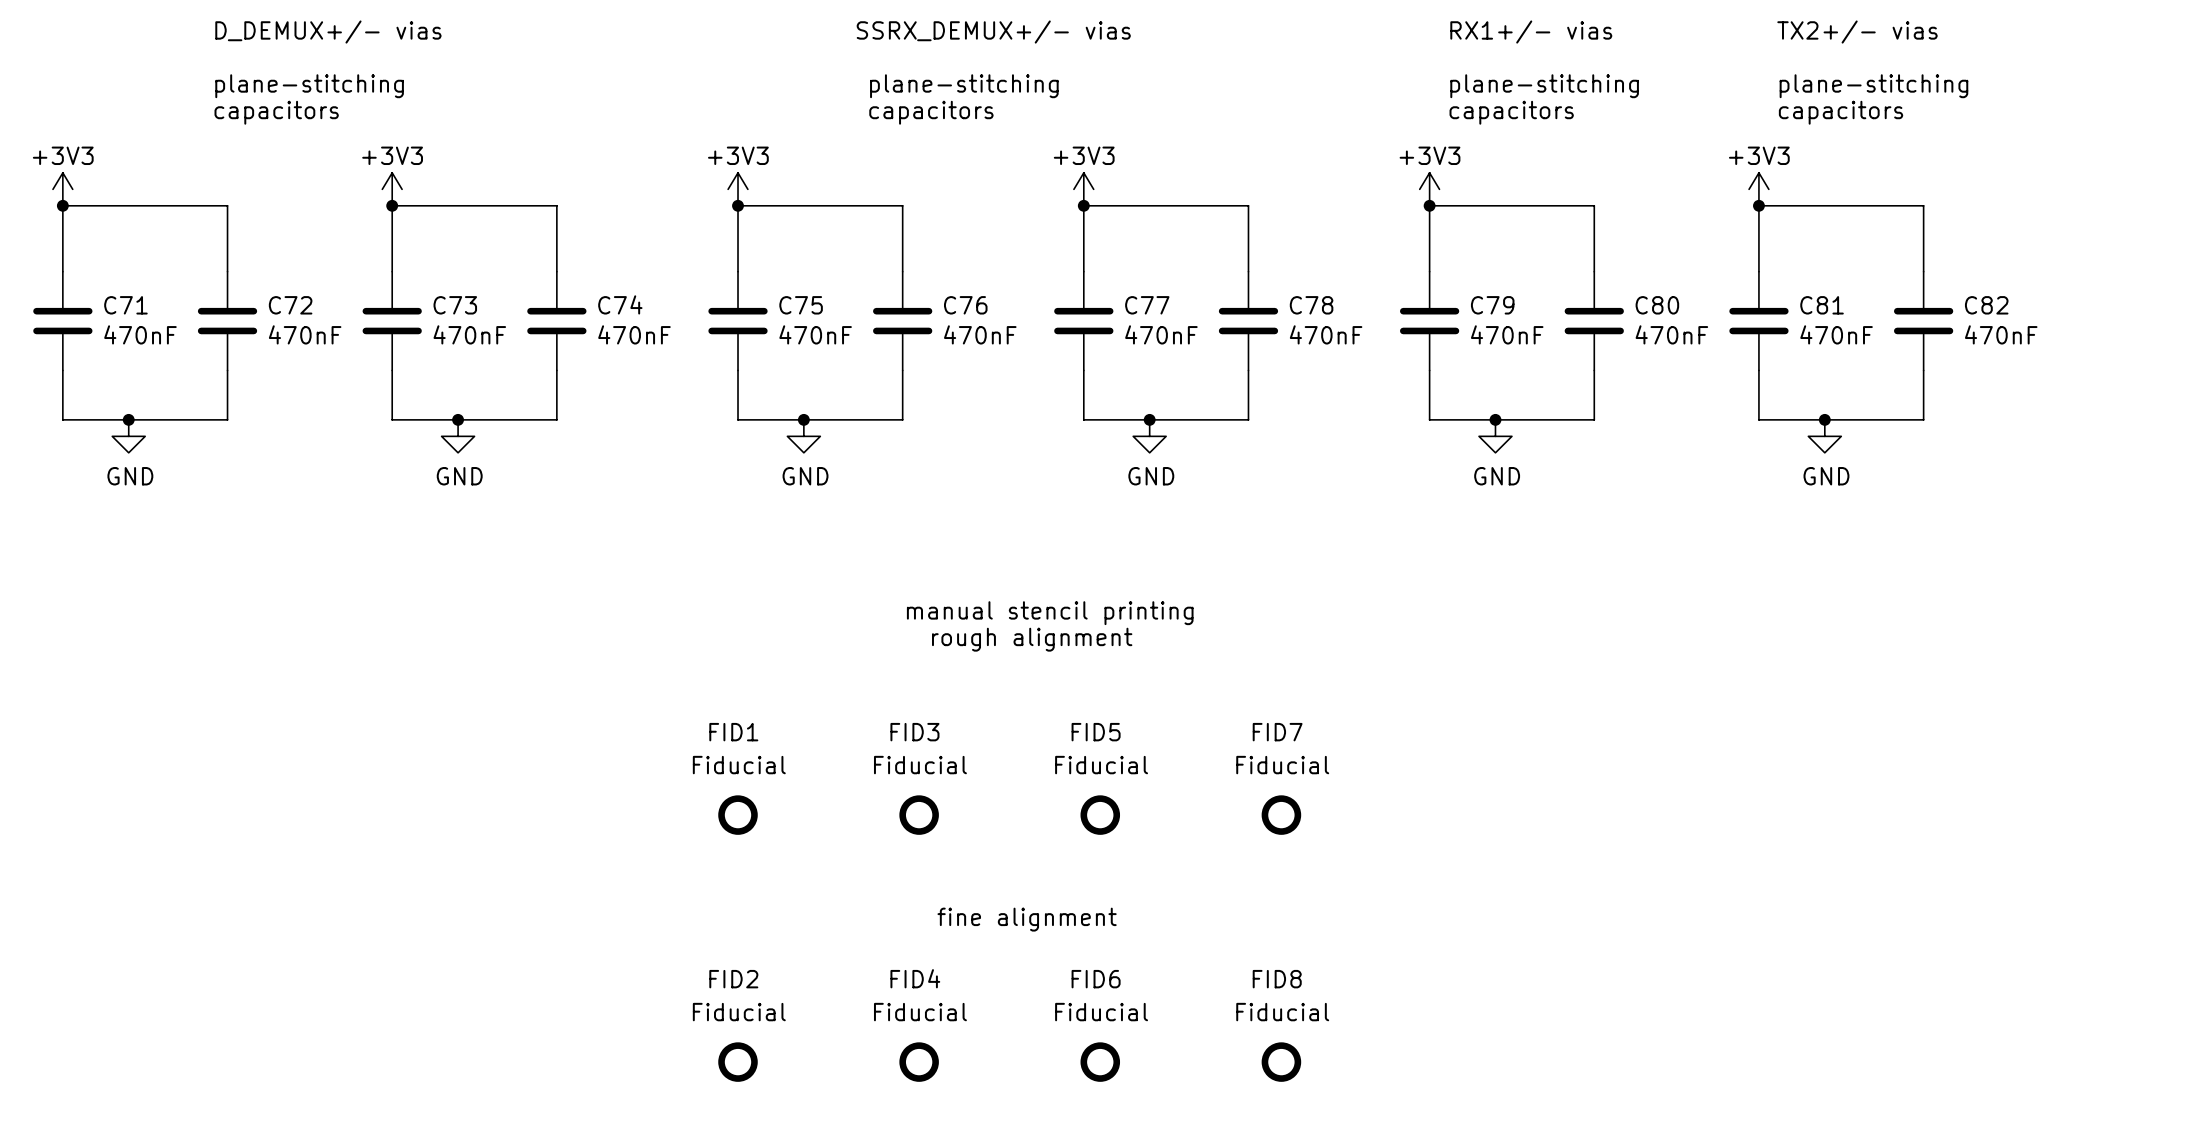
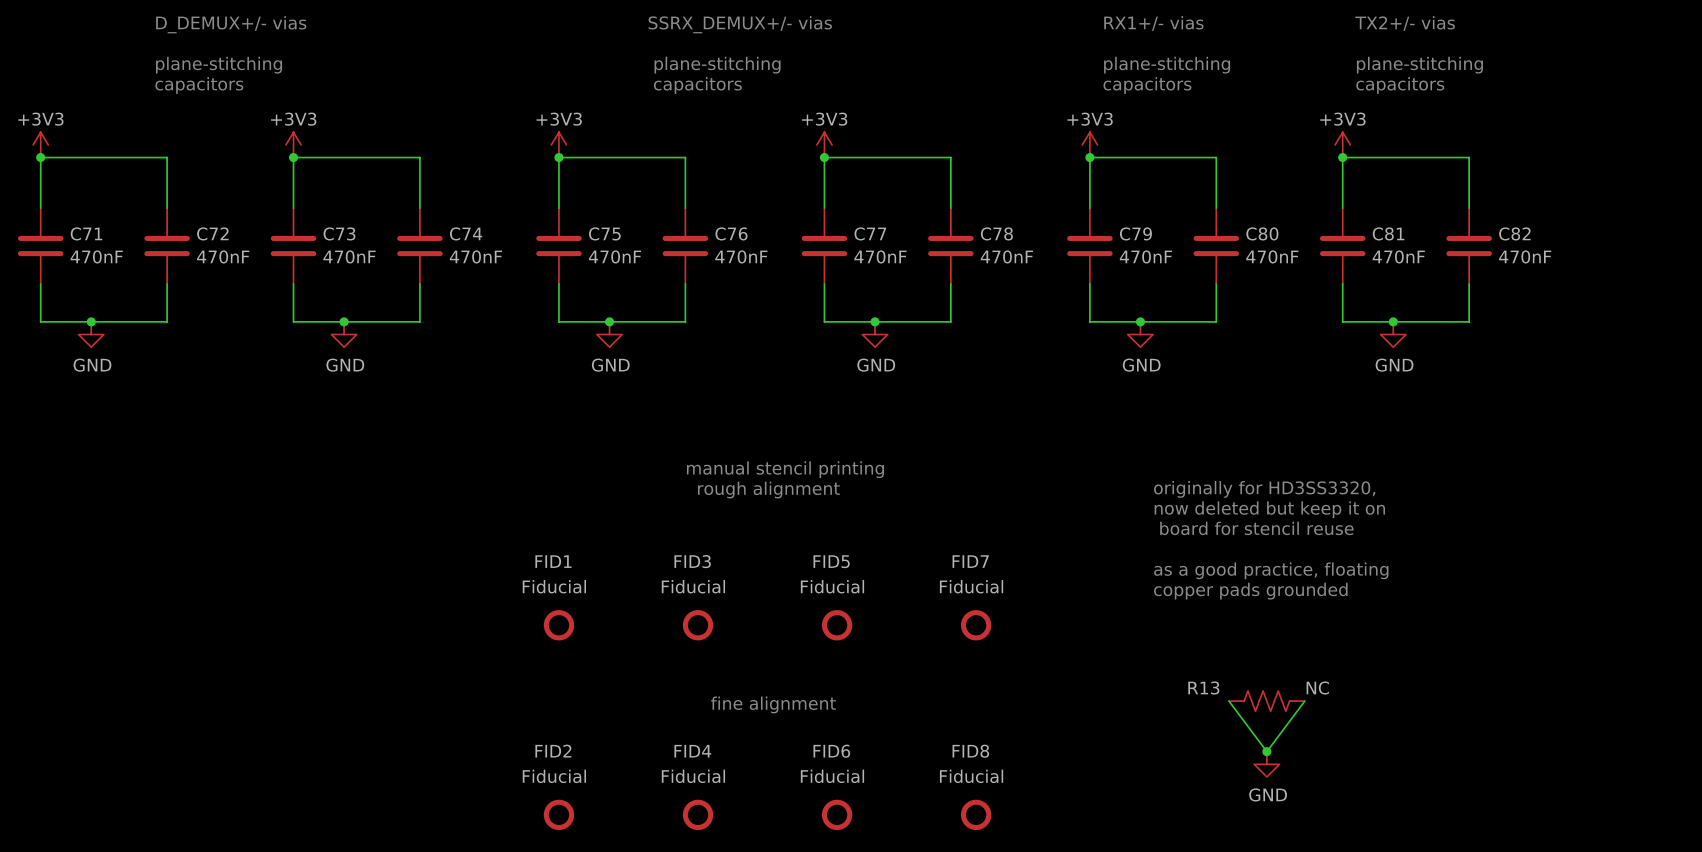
text: none -> originally for HD3SS3320, (1264, 489)
text: none -> now deleted but keep it on (1269, 509)
text: none -> board for stencil reuse (1256, 528)
text: none -> as a good practice, floating (1271, 570)
text: none -> copper pads grounded (1250, 591)
wire: none -> (1228, 701) (1266, 751) (1304, 701)
R13: none -> NC (1266, 701)
junction: none -> (1266, 751)
power symbol: none -> GND (1266, 764)

